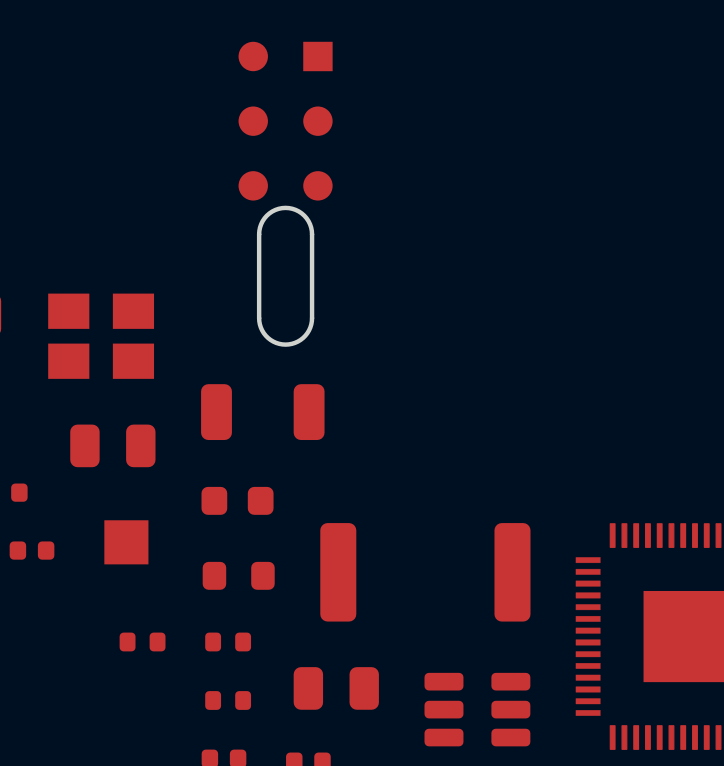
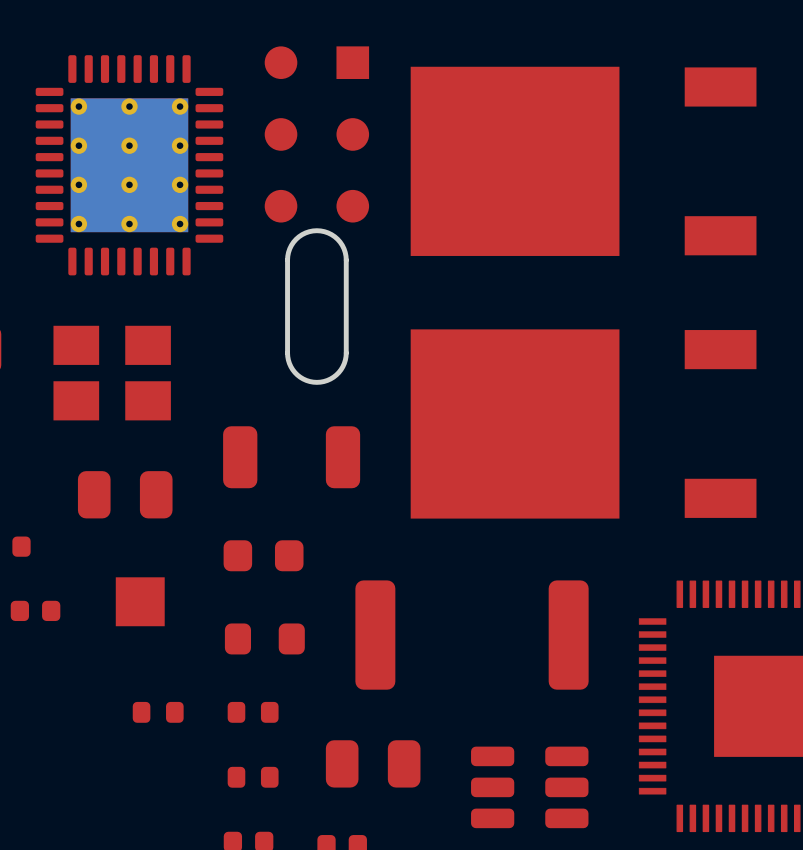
part: none -> (583, 161)
part: none -> (129, 165)
part: none -> (583, 423)

